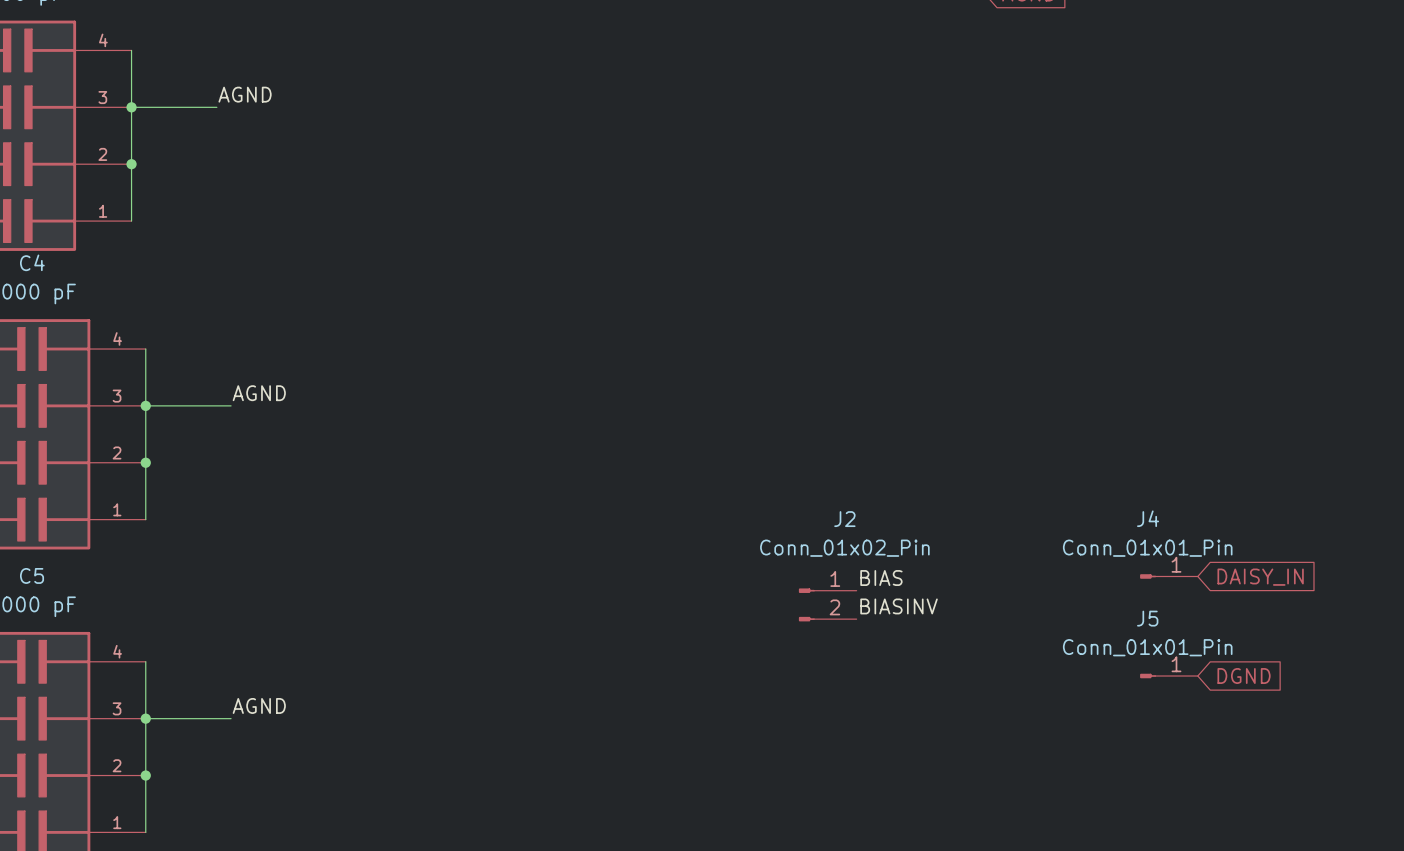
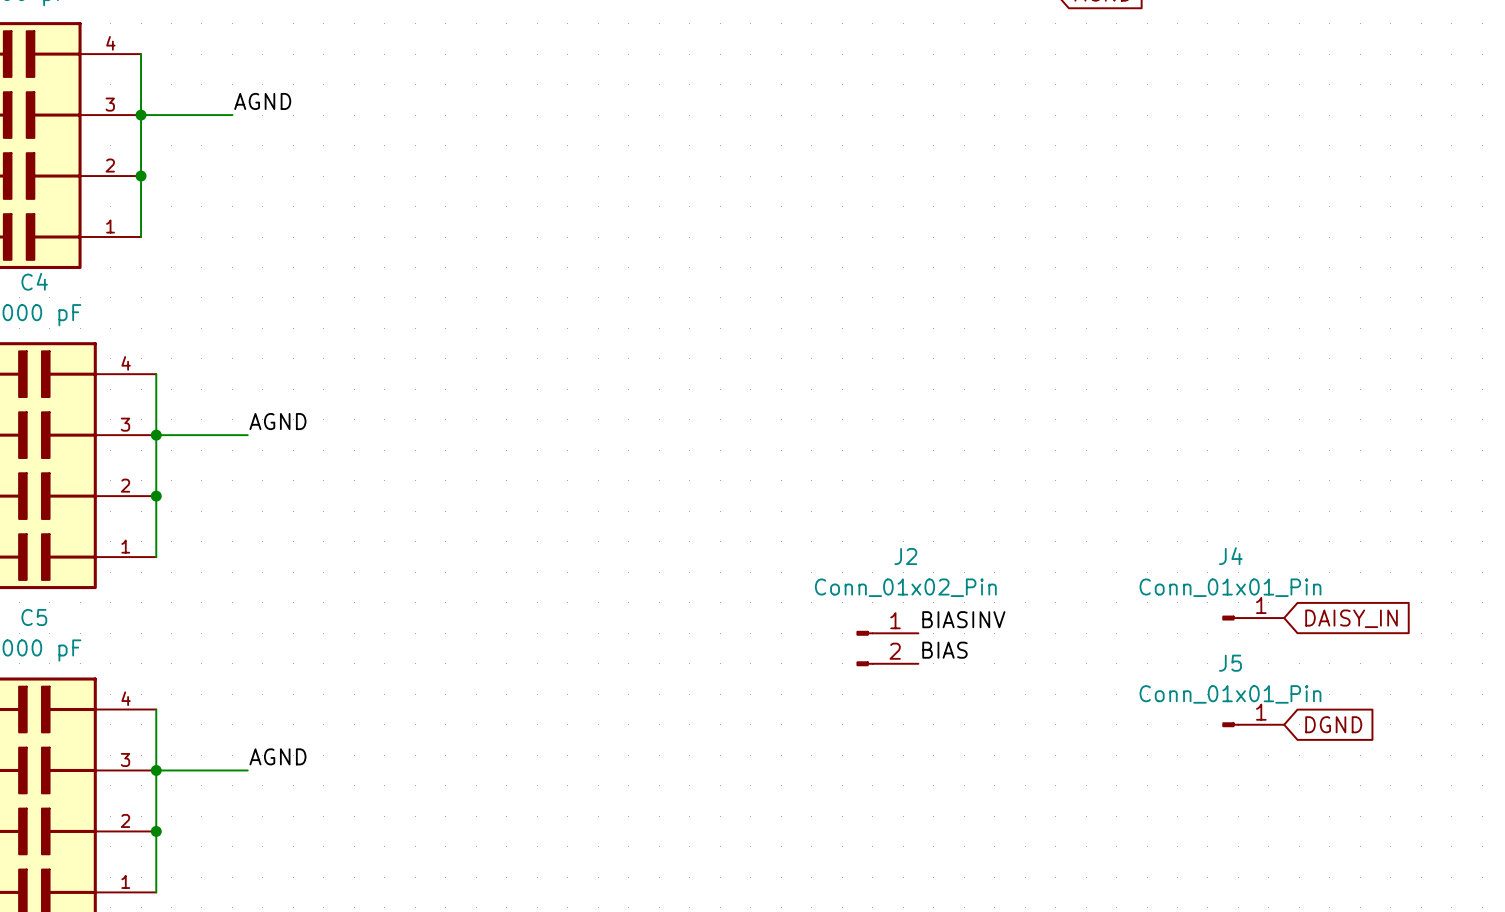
label: BIAS (881, 578) -> BIASINV (963, 619)
label: BIASINV (899, 606) -> BIAS (944, 650)

